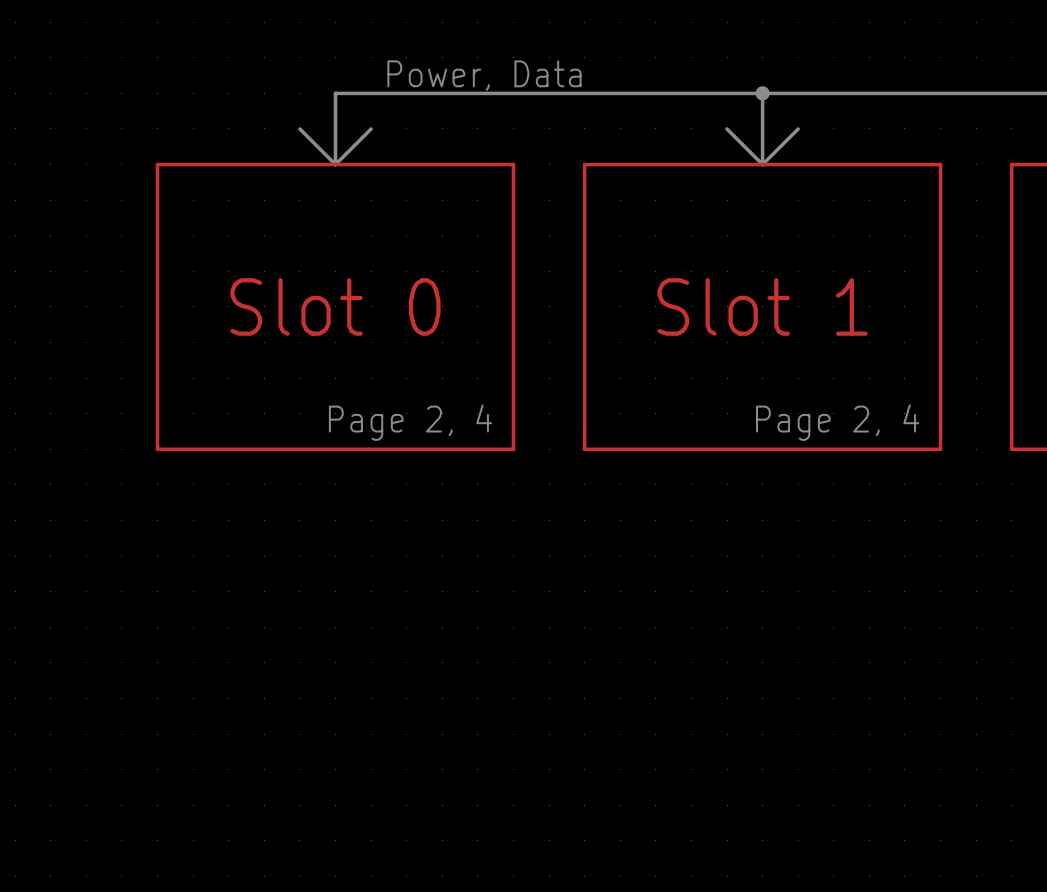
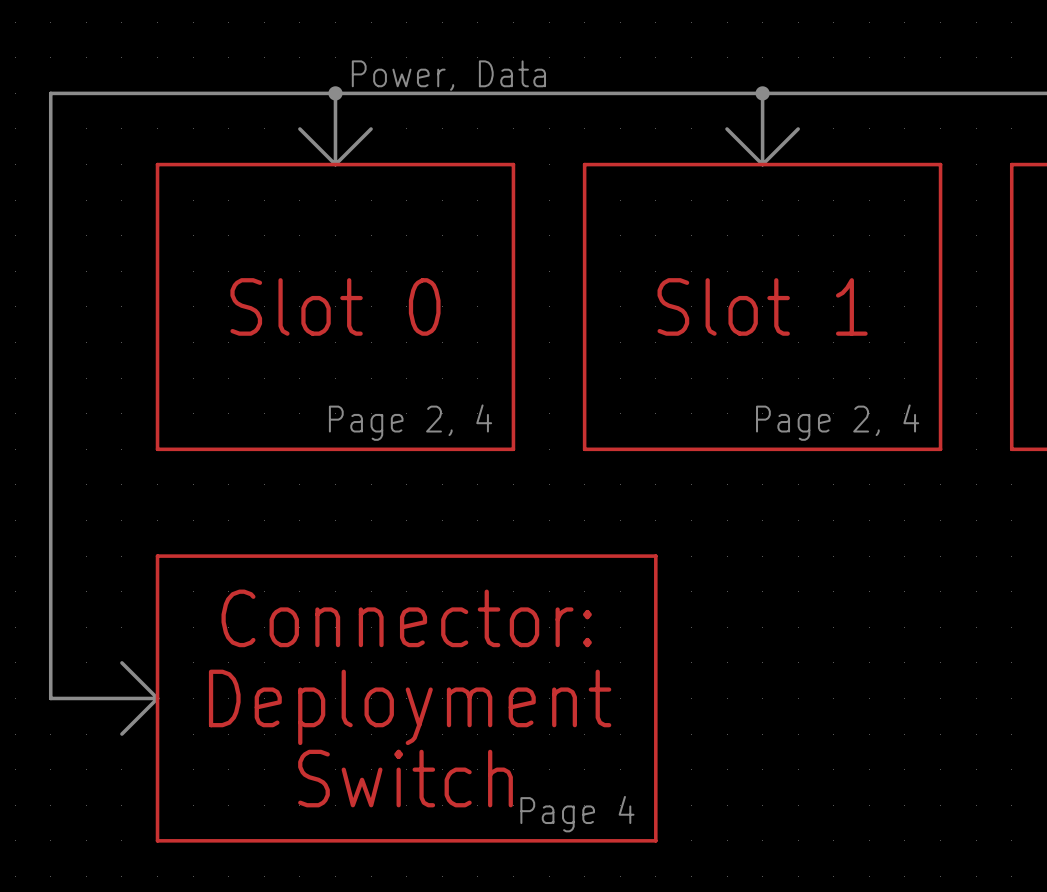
text position: Power, Data (484, 75) -> Power, Data (448, 75)
line: none -> (335, 93) (50, 93) (50, 698) (157, 698)
part: none -> (335, 93)
line: none -> (157, 556) (655, 556) (655, 840) (157, 840) (157, 556)
text: none -> Connector: (406, 618)
line: none -> (121, 662) (157, 698)
line: none -> (157, 698) (121, 734)
text: none -> Deployment (410, 707)
text: none -> Switch (405, 778)
text: none -> Page 4 (577, 814)

